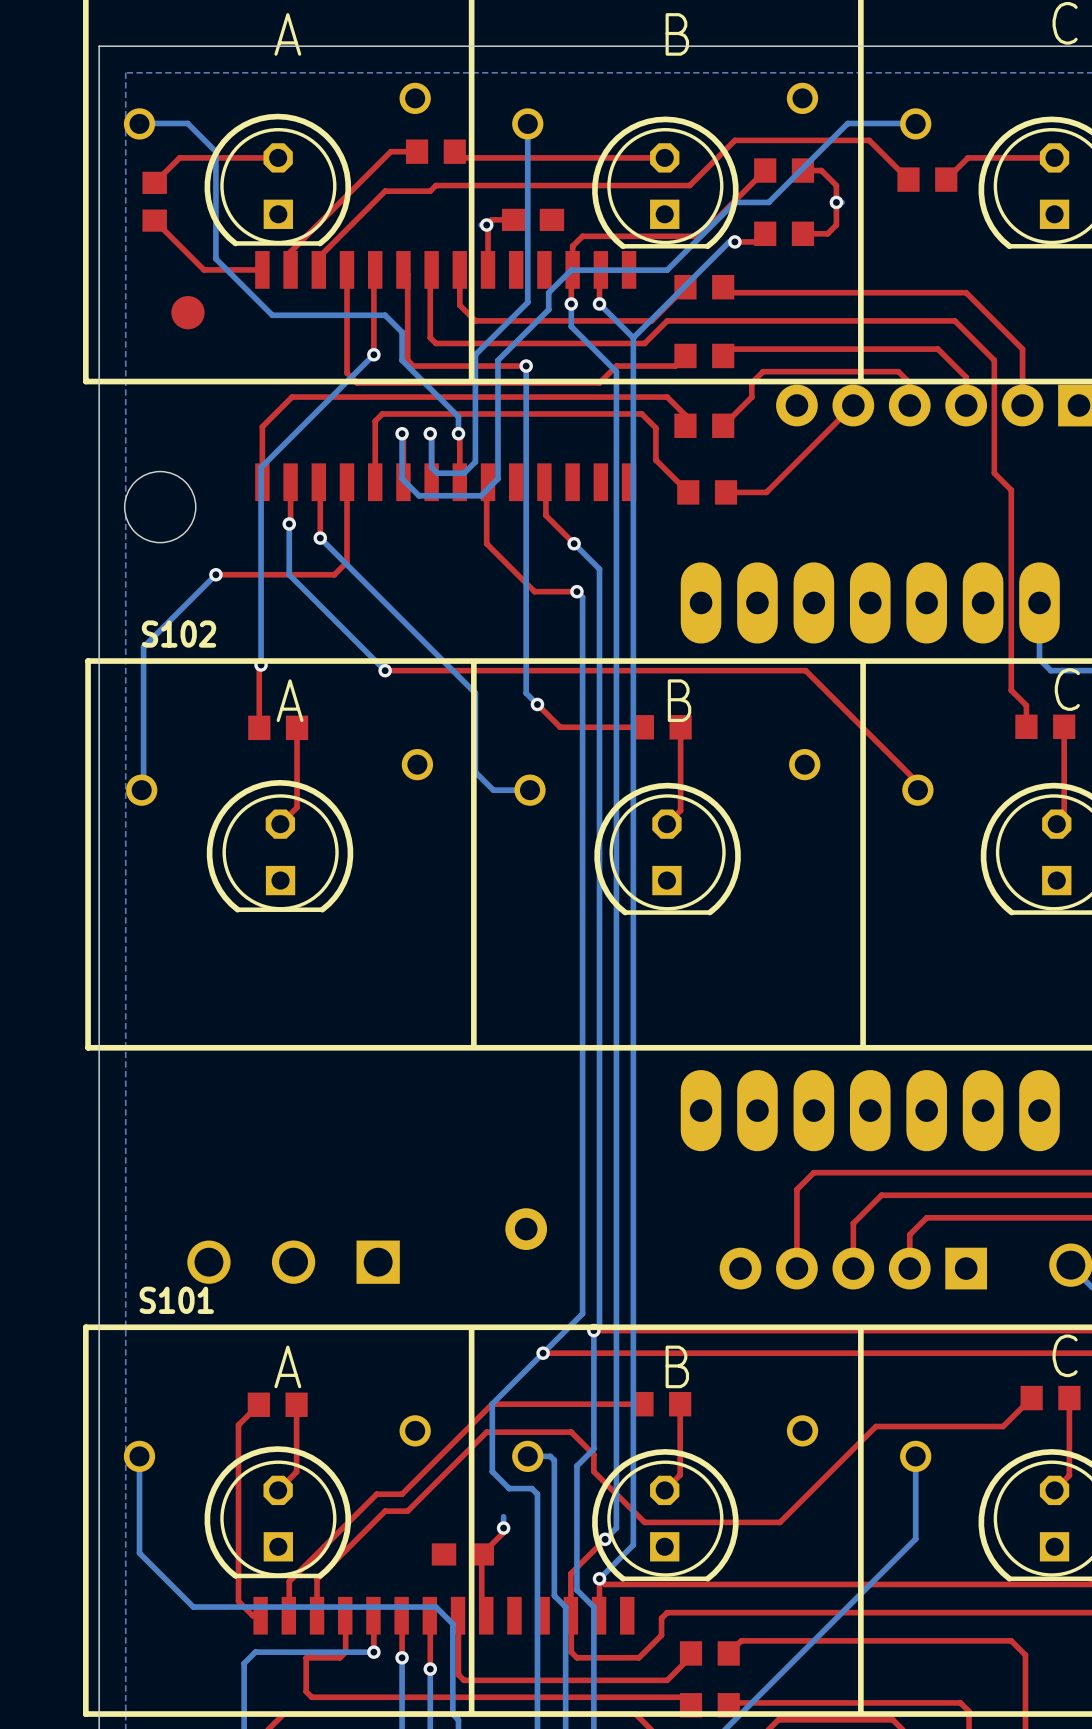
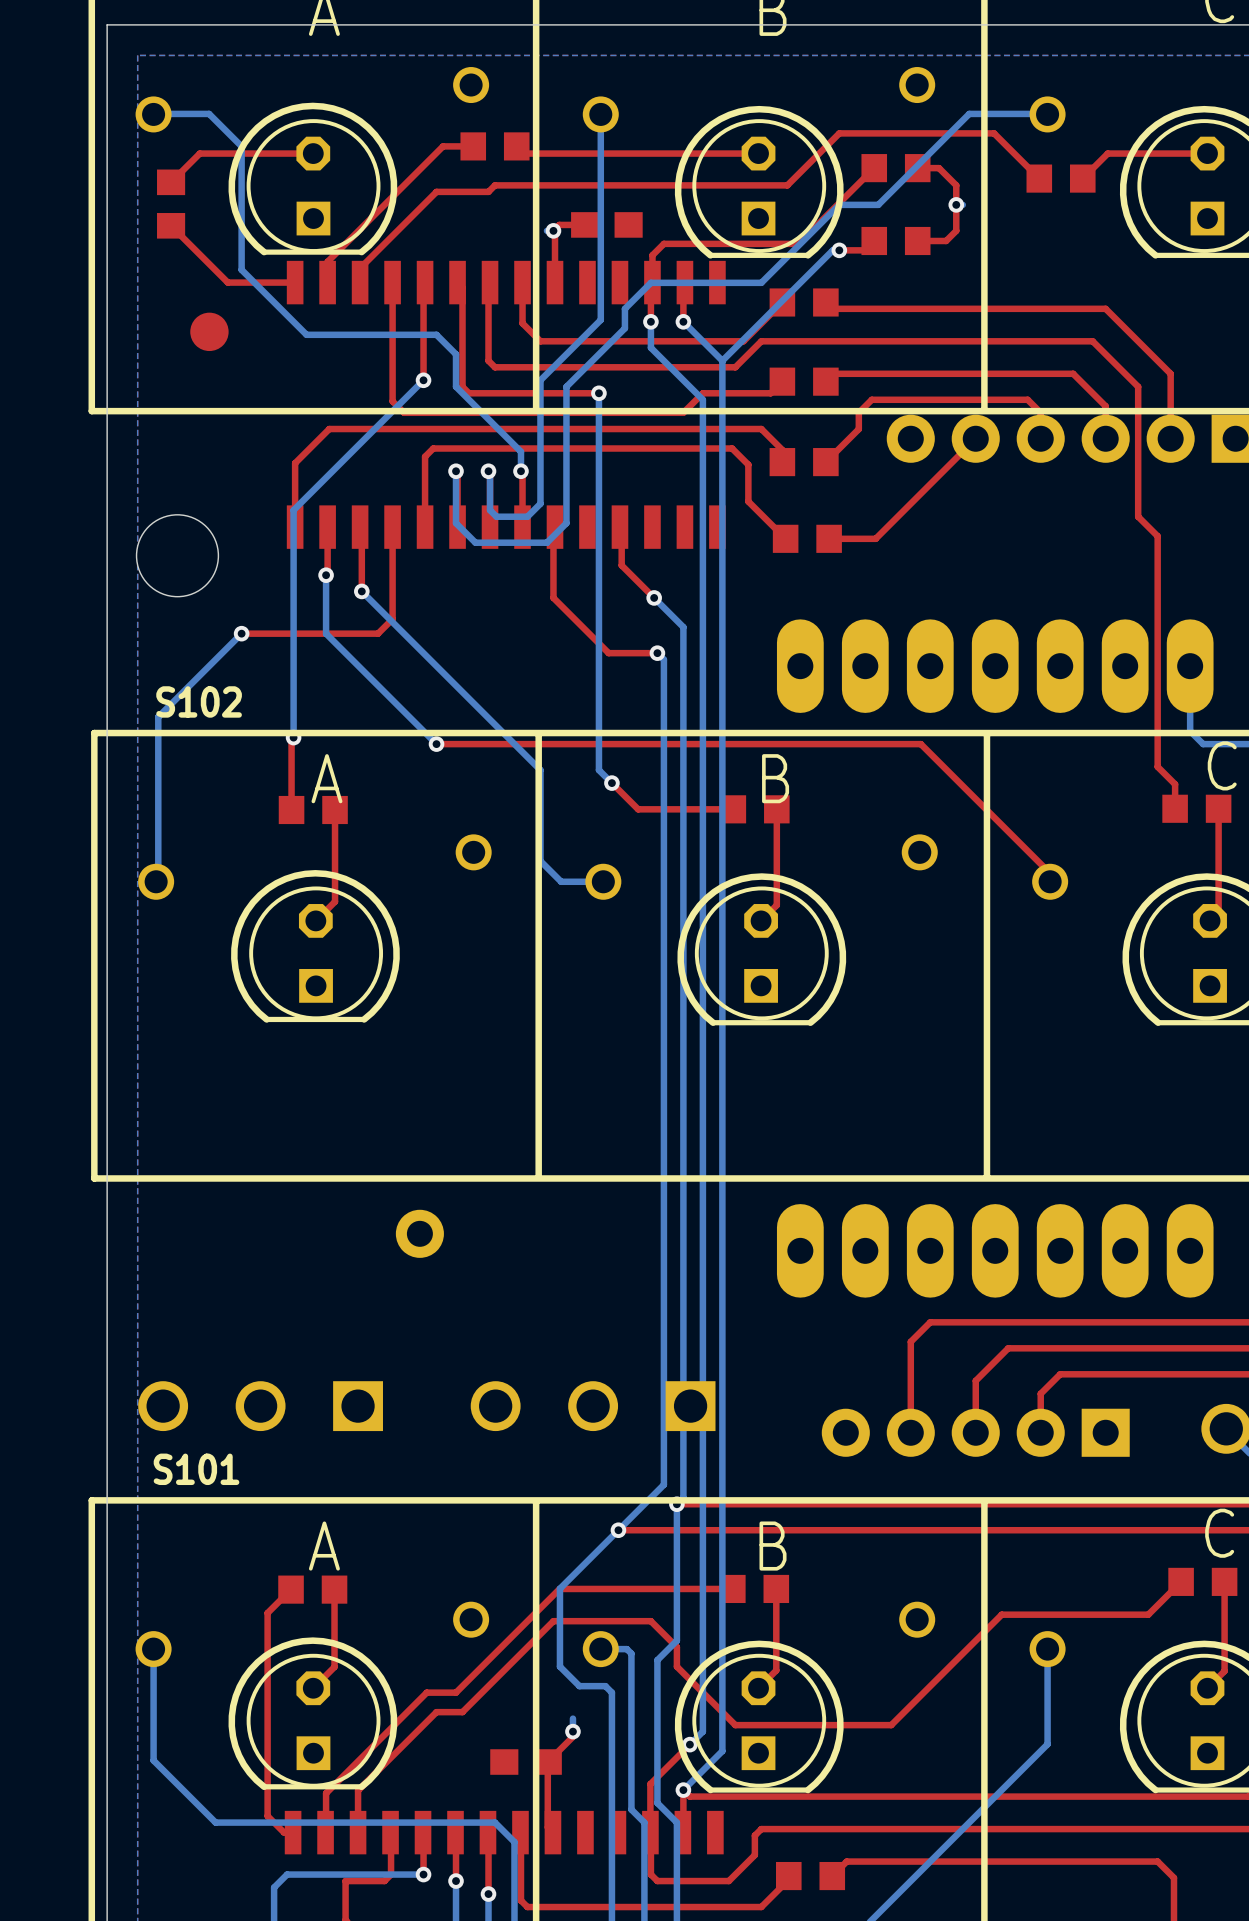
part: none -> (419, 1233)
part footprint: [505, 1208, 548, 1250] -> [470, 1381, 716, 1432]
part position: (293, 1262) -> (260, 1406)

